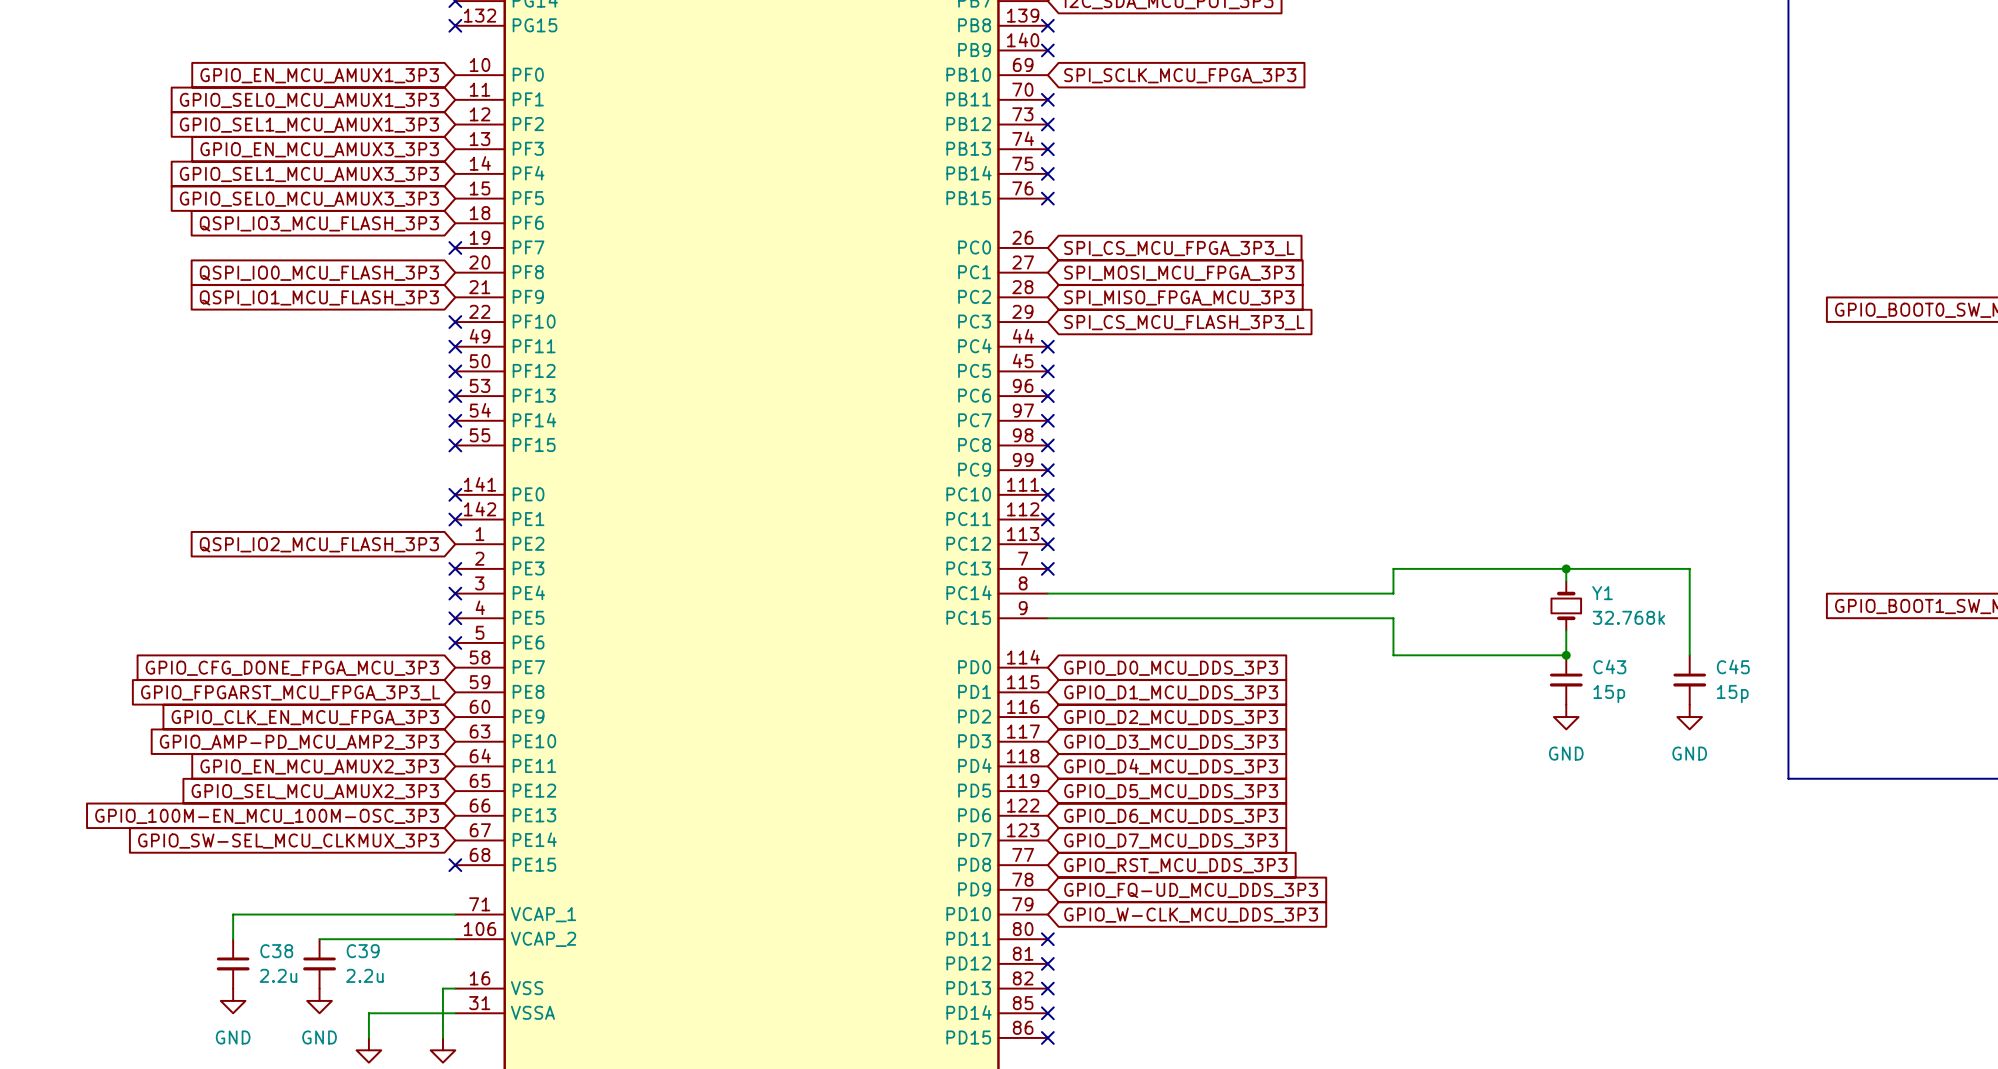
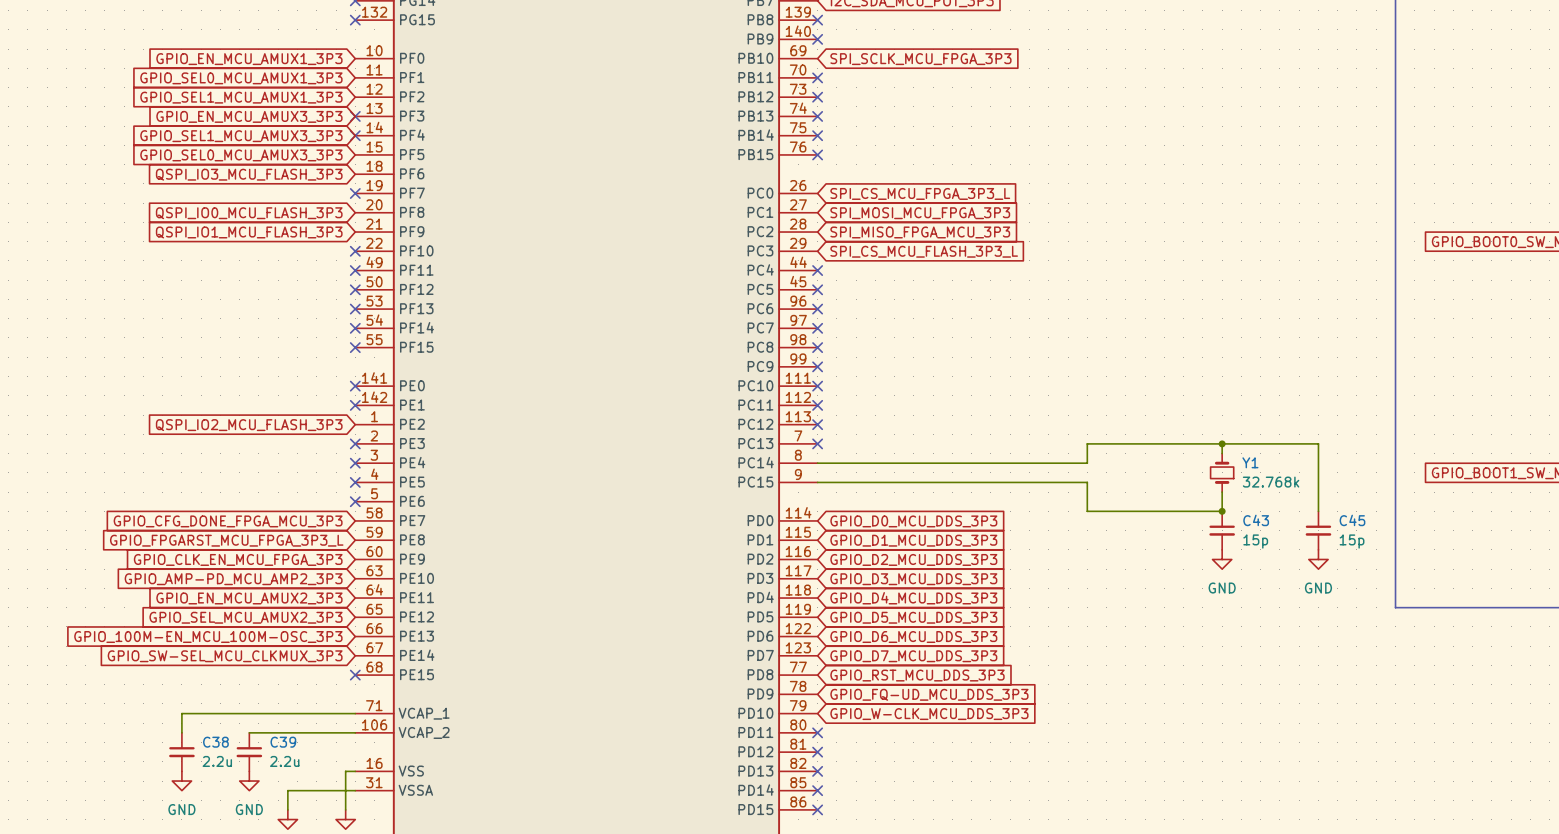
no-connect mark: none -> (355, 116)
no-connect mark: none -> (355, 135)

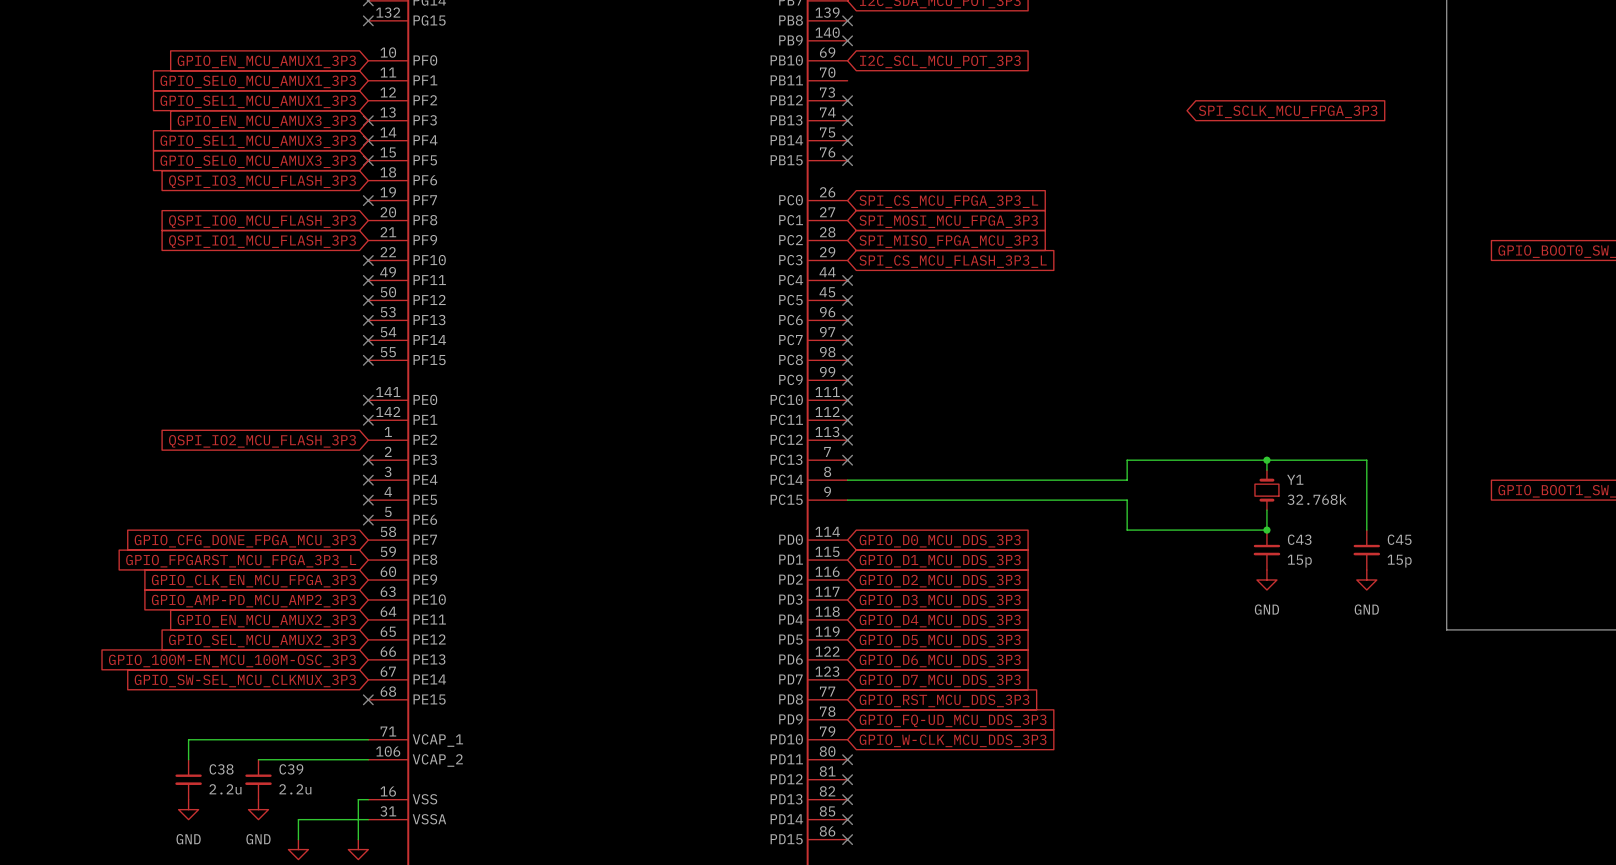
global label: SPI_SCLK_MCU_FPGA_3P3 (920, 59) -> I2C_SCL_MCU_POT_3P3 (940, 61)
no-connect mark: (817, 77) -> none
global label: none -> SPI_SCLK_MCU_FPGA_3P3 (1288, 111)
no-connect mark: none -> (368, 160)

